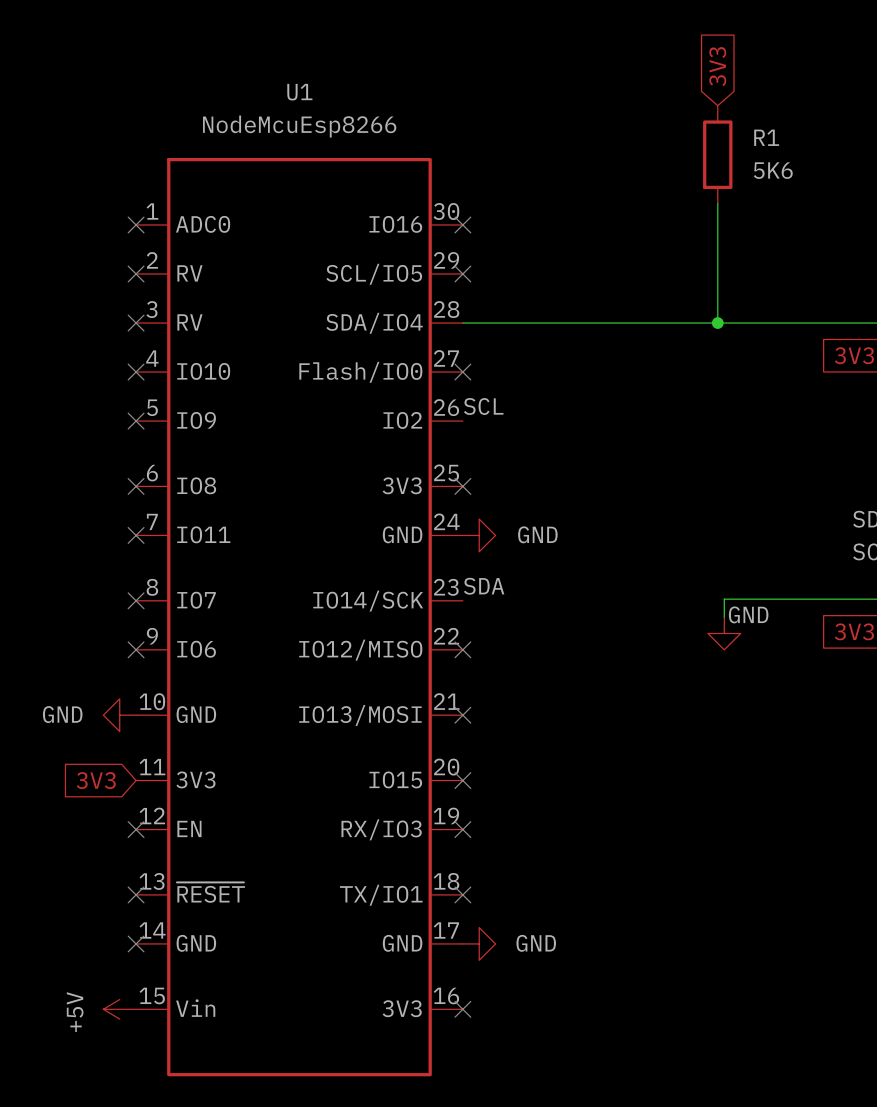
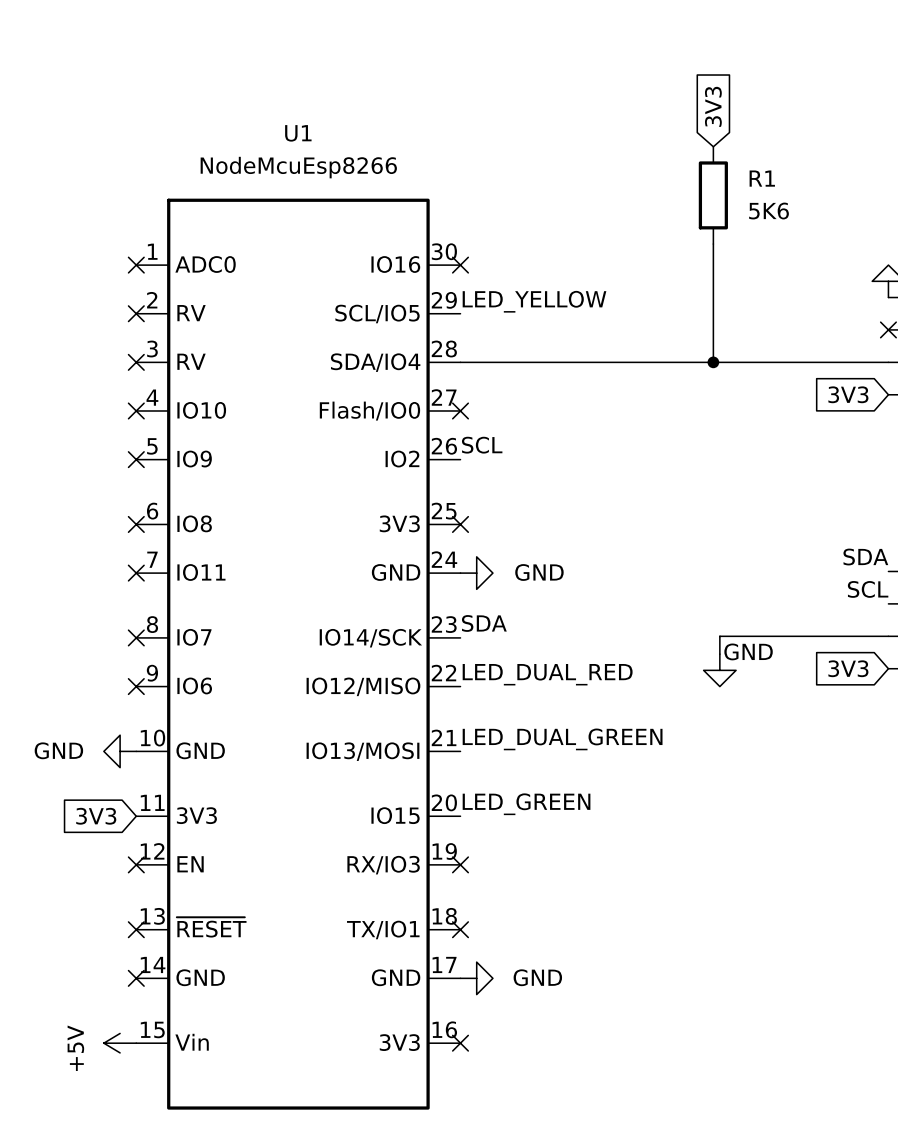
label: none -> LED_YELLOW (534, 301)
no-connect mark: (462, 274) -> none
label: none -> LED_DUAL_RED (547, 674)
no-connect mark: (462, 649) -> none
label: none -> LED_DUAL_GREEN (562, 739)
no-connect mark: (462, 715) -> none
label: none -> LED_GREEN (526, 804)
no-connect mark: (462, 780) -> none

